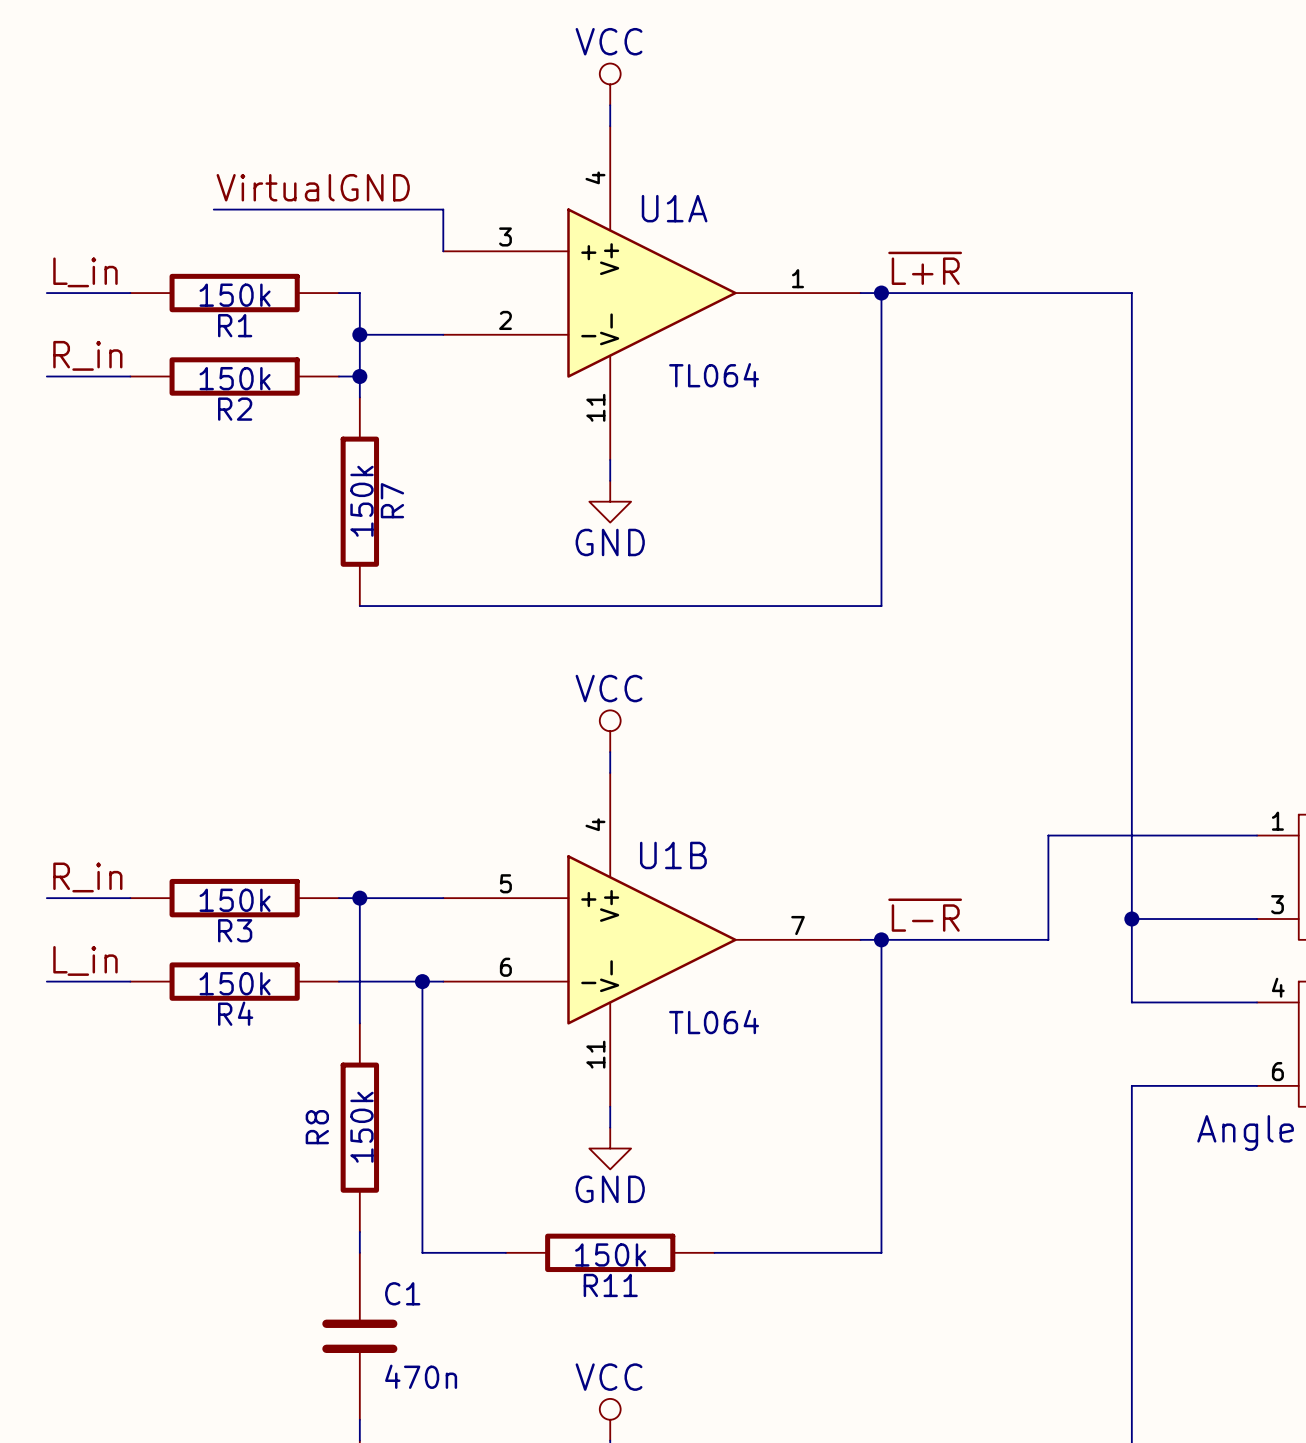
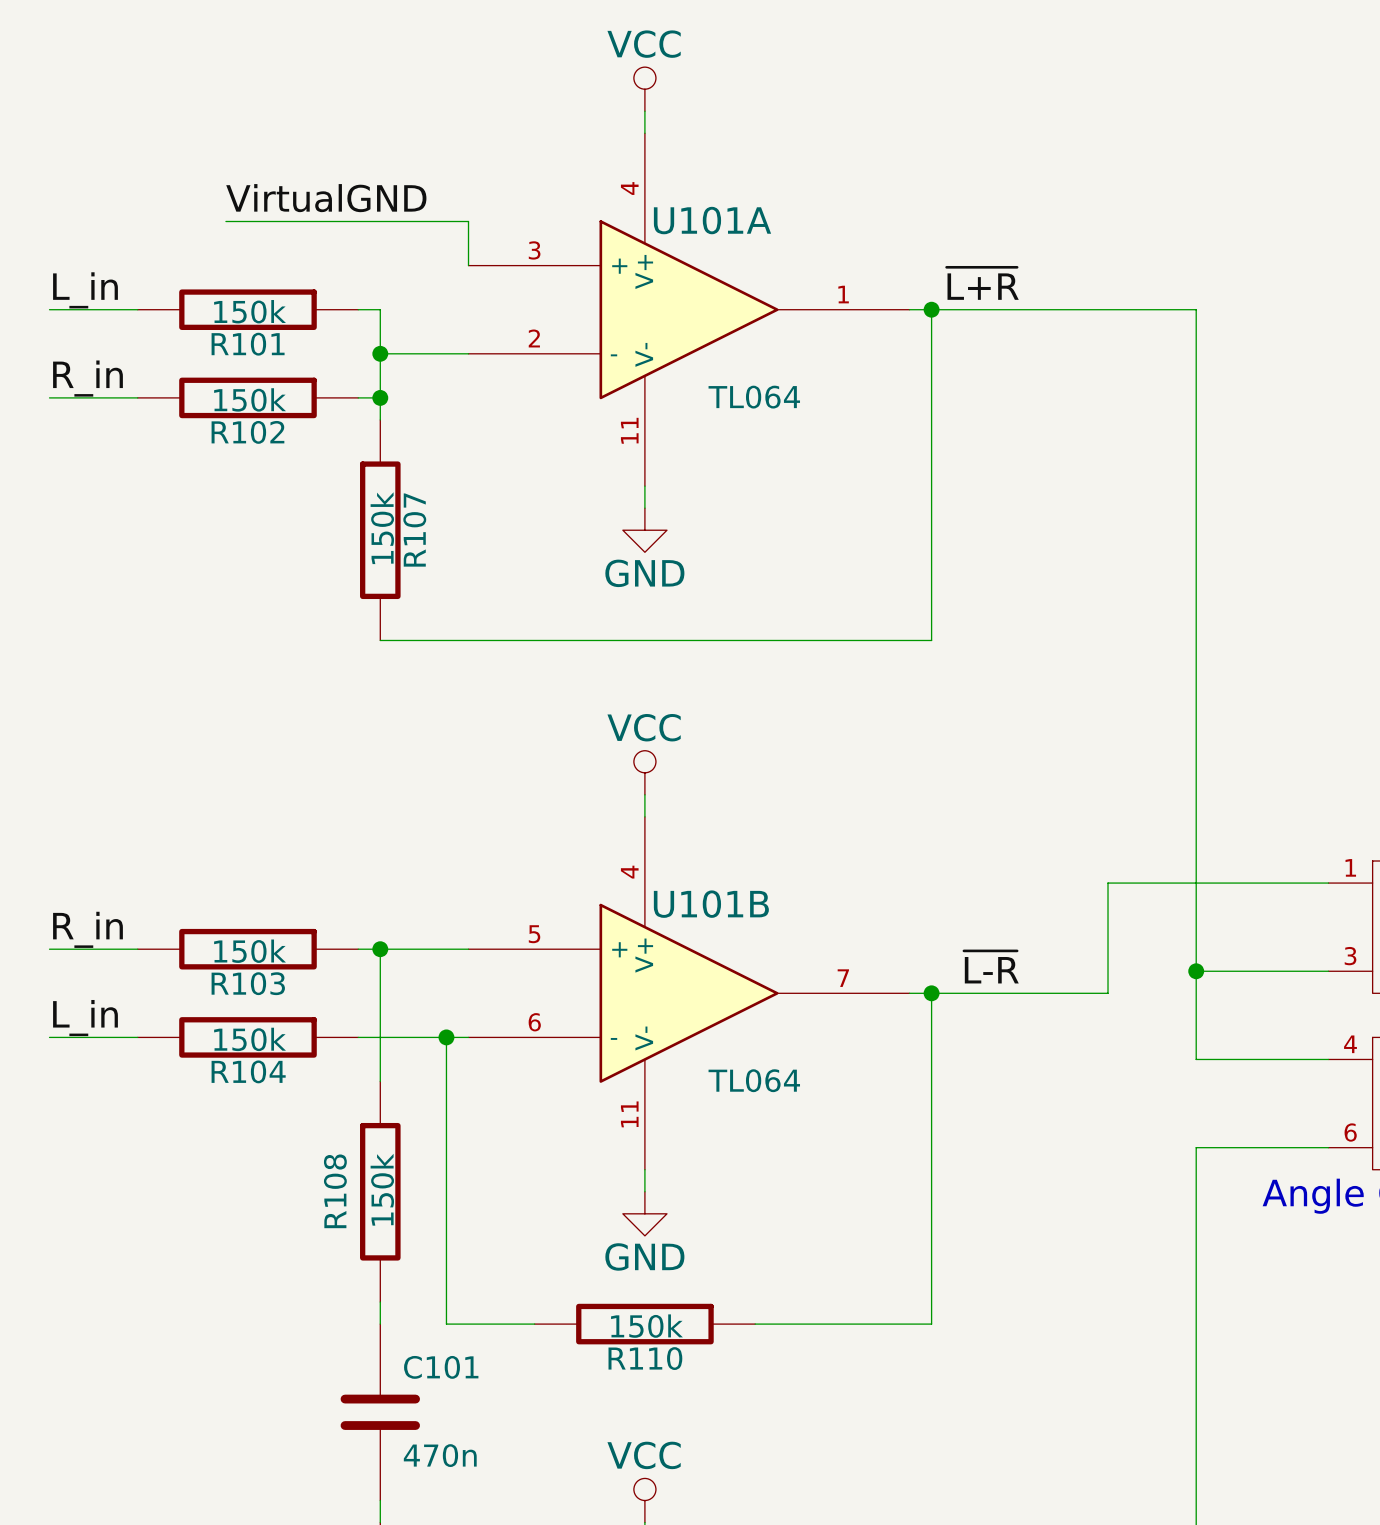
U1A name: U1A (674, 208) -> U101A (712, 220)
R1 name: R1 (235, 325) -> R101 (248, 344)
R2 name: R2 (235, 409) -> R102 (247, 432)
R7 name: R7 (392, 500) -> R107 (414, 530)
U1B name: U1B (673, 855) -> U101B (711, 904)
R3 name: R3 (235, 930) -> R103 (248, 983)
R4 name: R4 (235, 1013) -> R104 (248, 1071)
R8 name: R8 (317, 1127) -> R108 (335, 1191)
R11 name: R11 (610, 1285) -> R110 (645, 1358)
C1 name: C1 (402, 1293) -> C101 (441, 1367)

